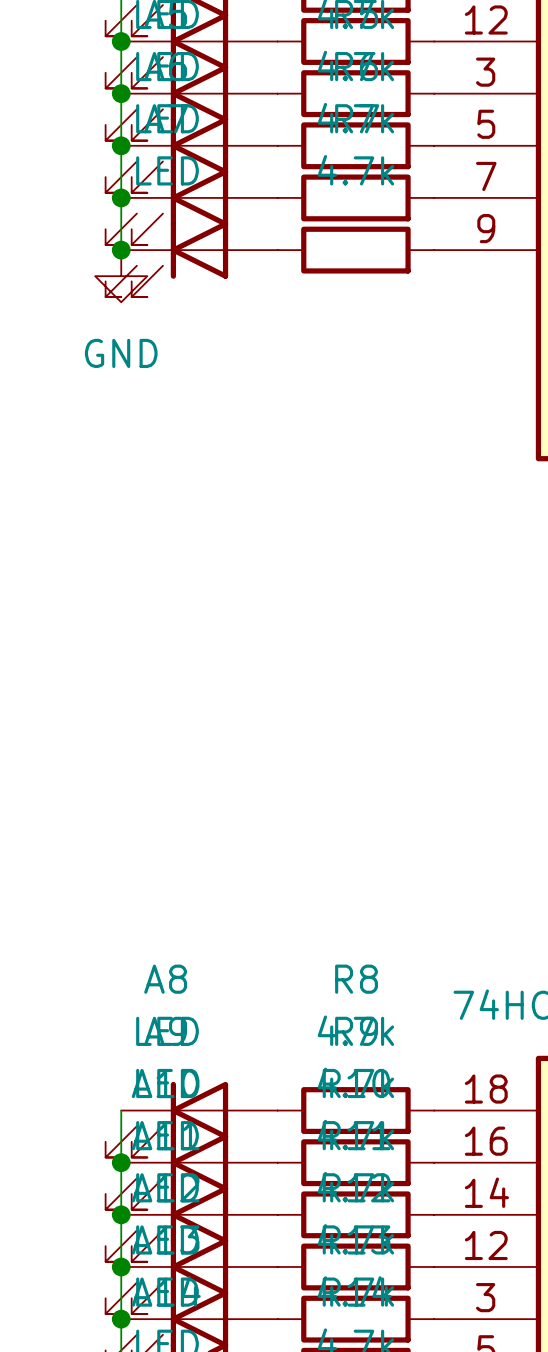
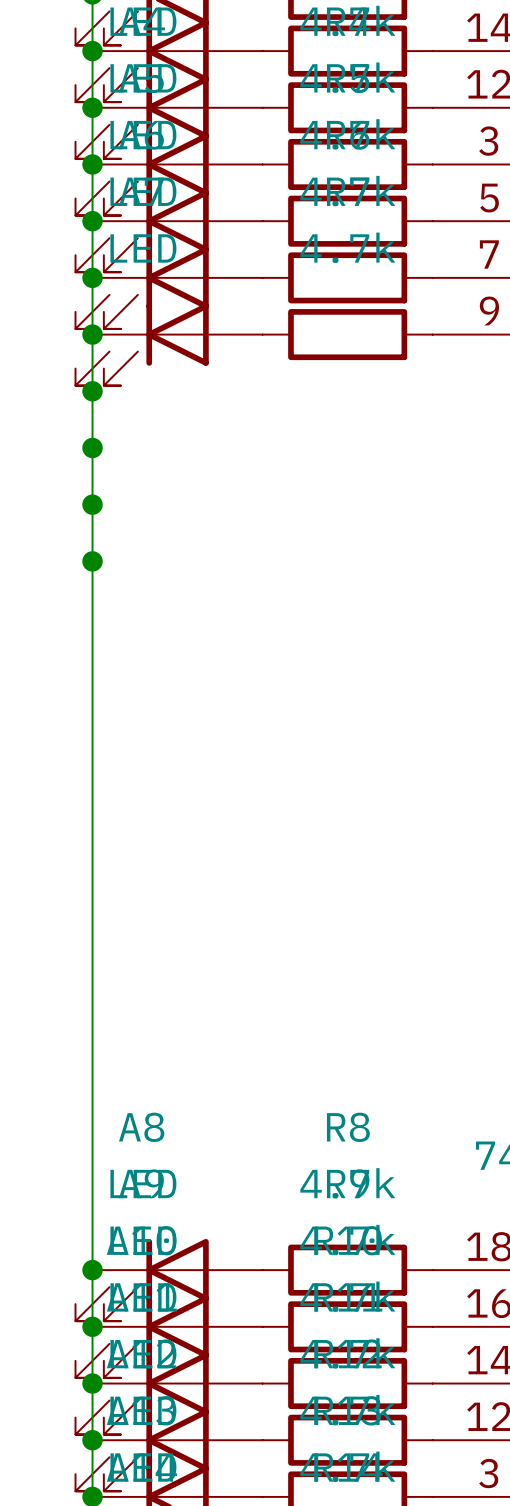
wire: none -> (92, 334) (92, 1270)
power symbol: GND (121, 276) -> none
junction: none -> (92, 391)
junction: none -> (92, 447)
junction: none -> (92, 504)
junction: none -> (92, 561)
junction: none -> (92, 1270)

